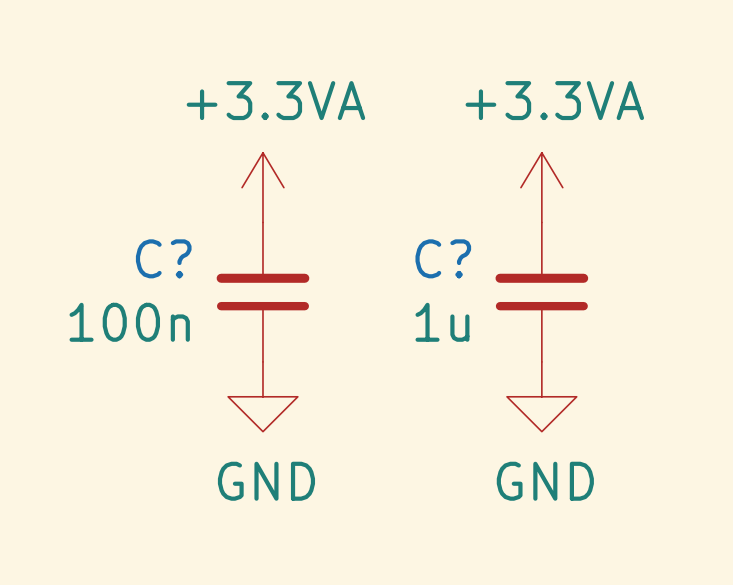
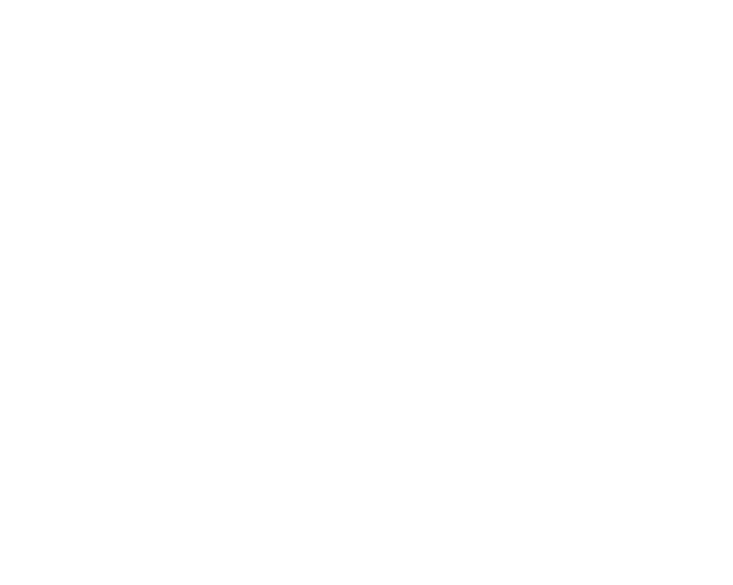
power symbol: +3.3VA (262, 187) -> none
power symbol: +3.3VA (541, 187) -> none
C?: 100n (262, 292) -> none
C?: 1u (541, 292) -> none
power symbol: GND (262, 396) -> none
power symbol: GND (541, 396) -> none

